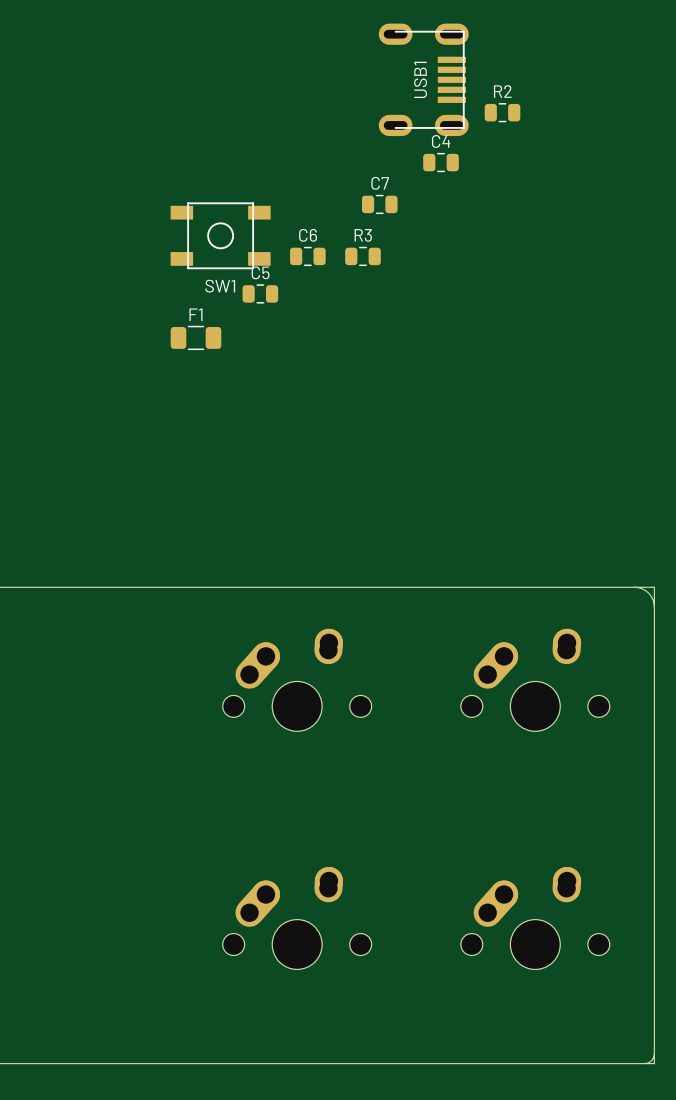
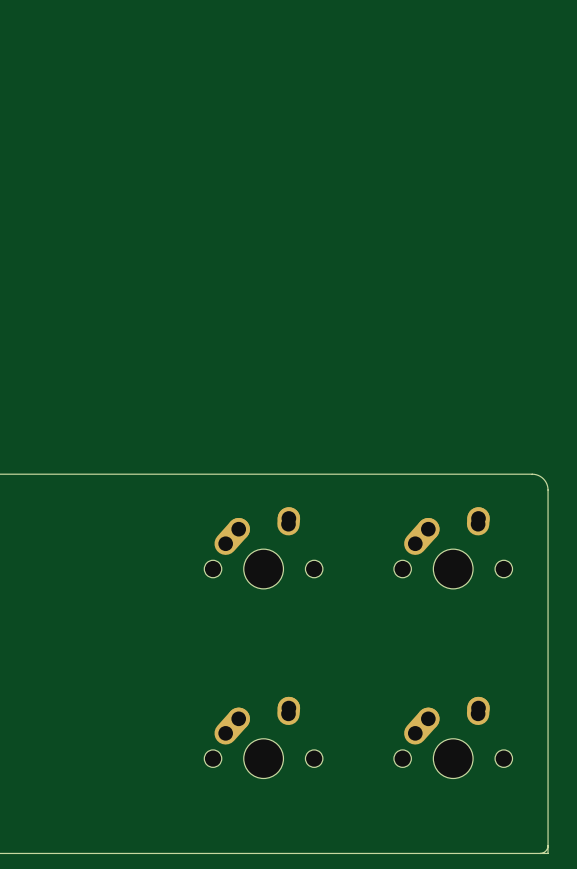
USB1: (423, 79) -> none
R2: (502, 112) -> none
C4: (441, 162) -> none
C7: (379, 204) -> none
SW1: (220, 235) -> none
C6: (307, 256) -> none
R3: (362, 256) -> none
C5: (260, 293) -> none
F1: (195, 337) -> none
board edge: (634, 587) (654, 587) (654, 607) -> none

